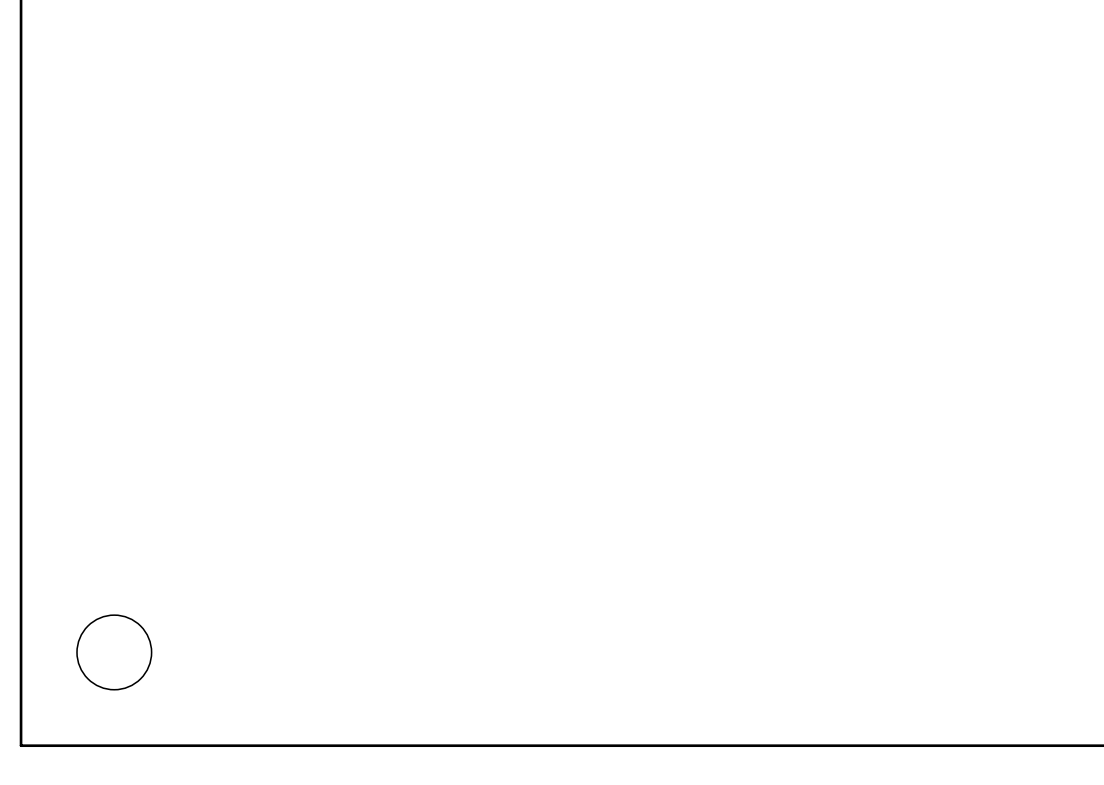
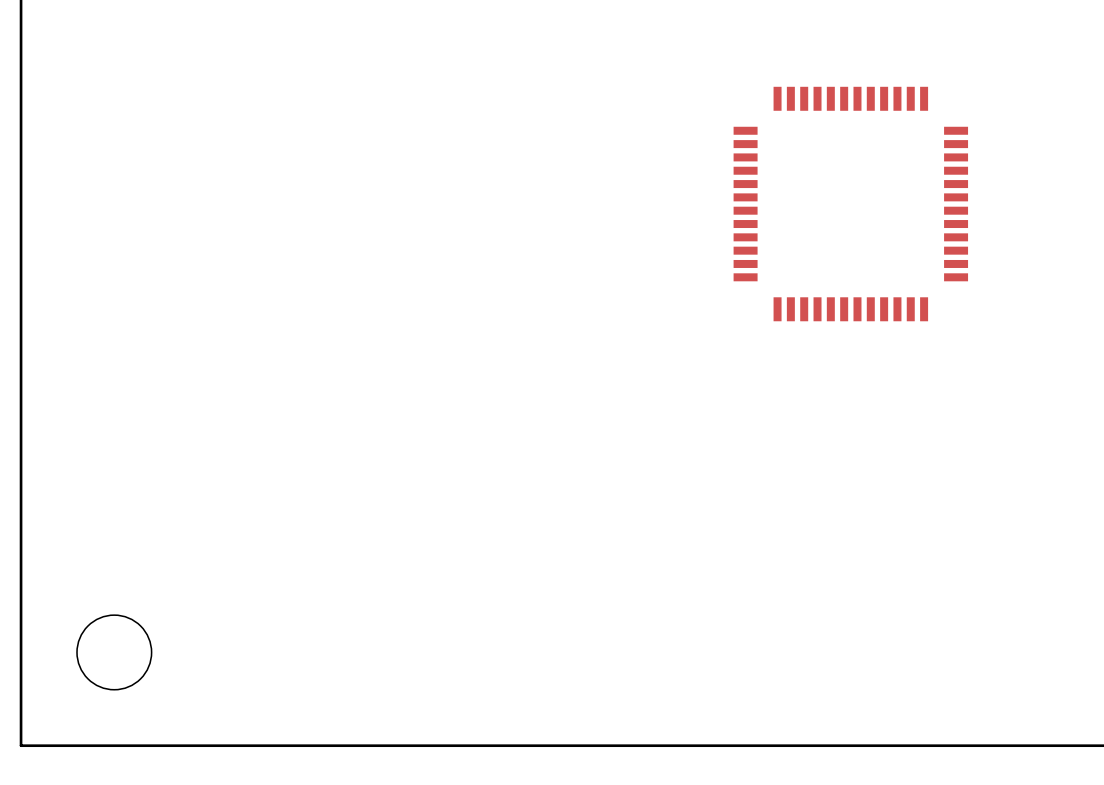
part: none -> (850, 204)

